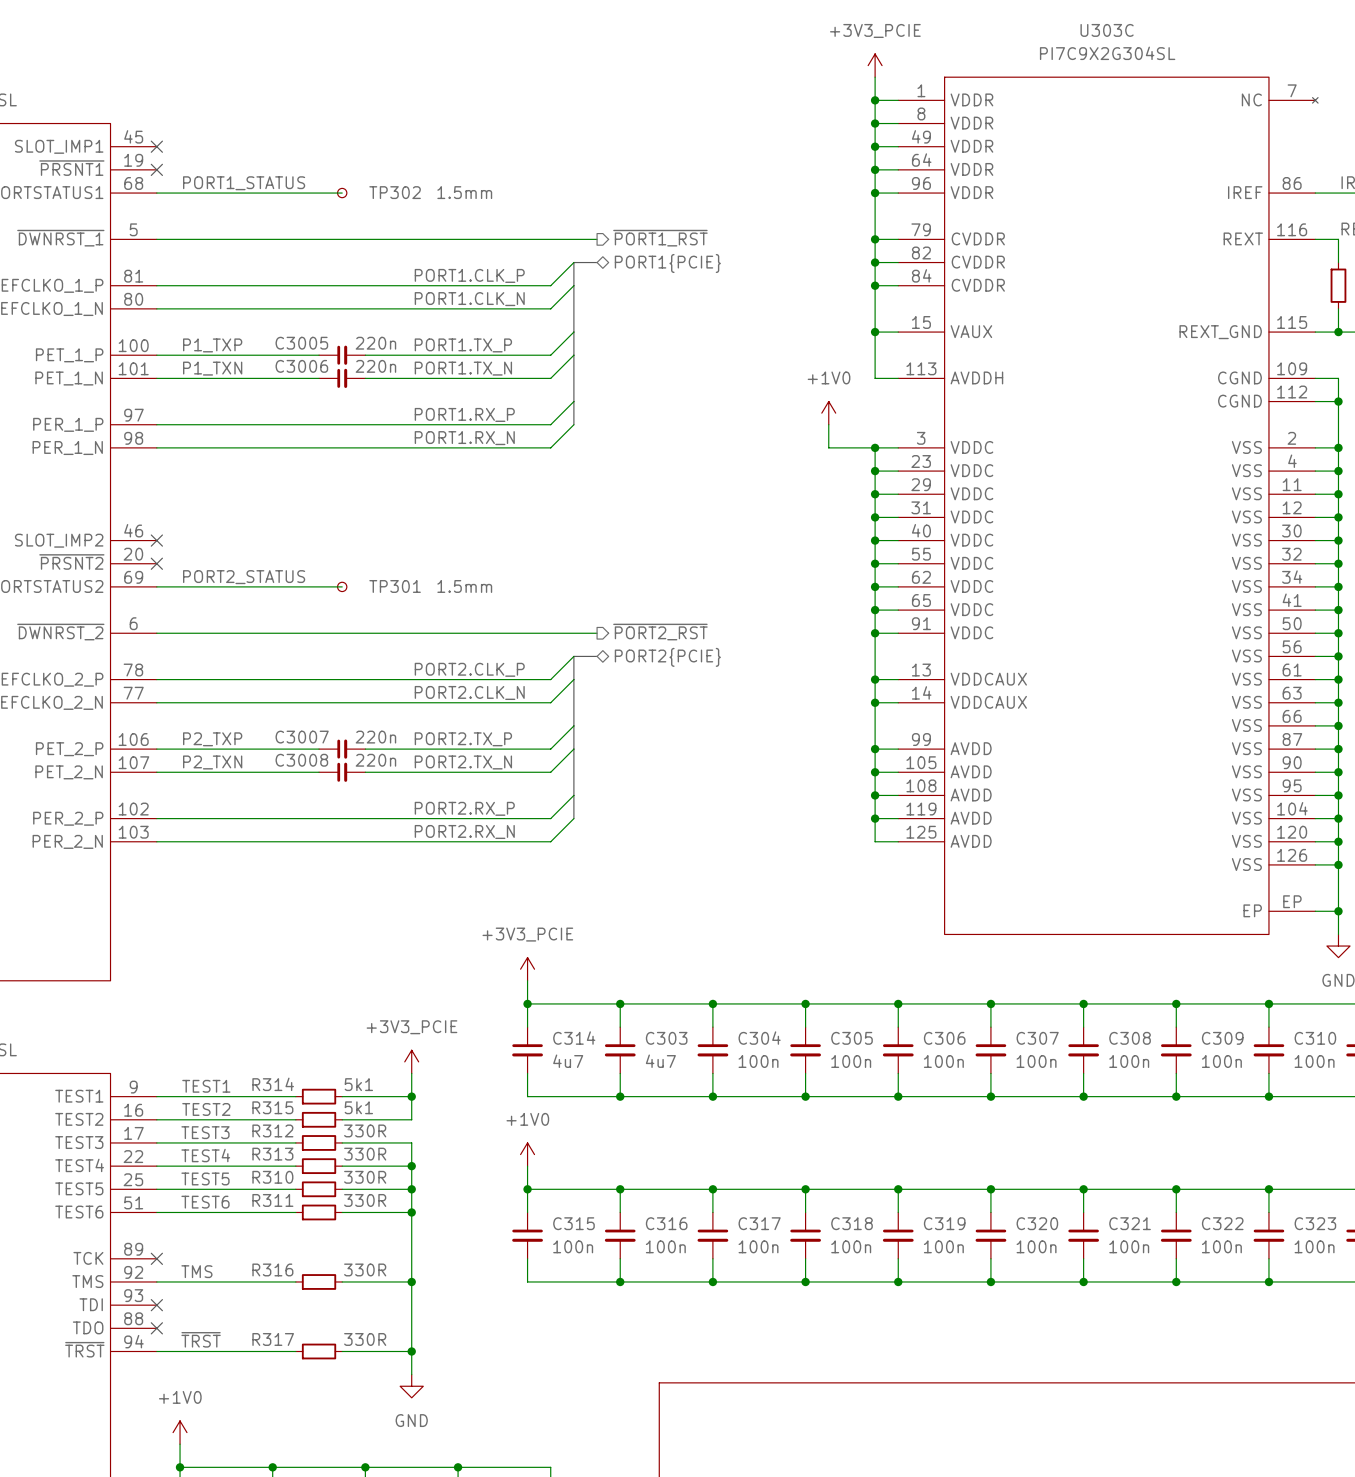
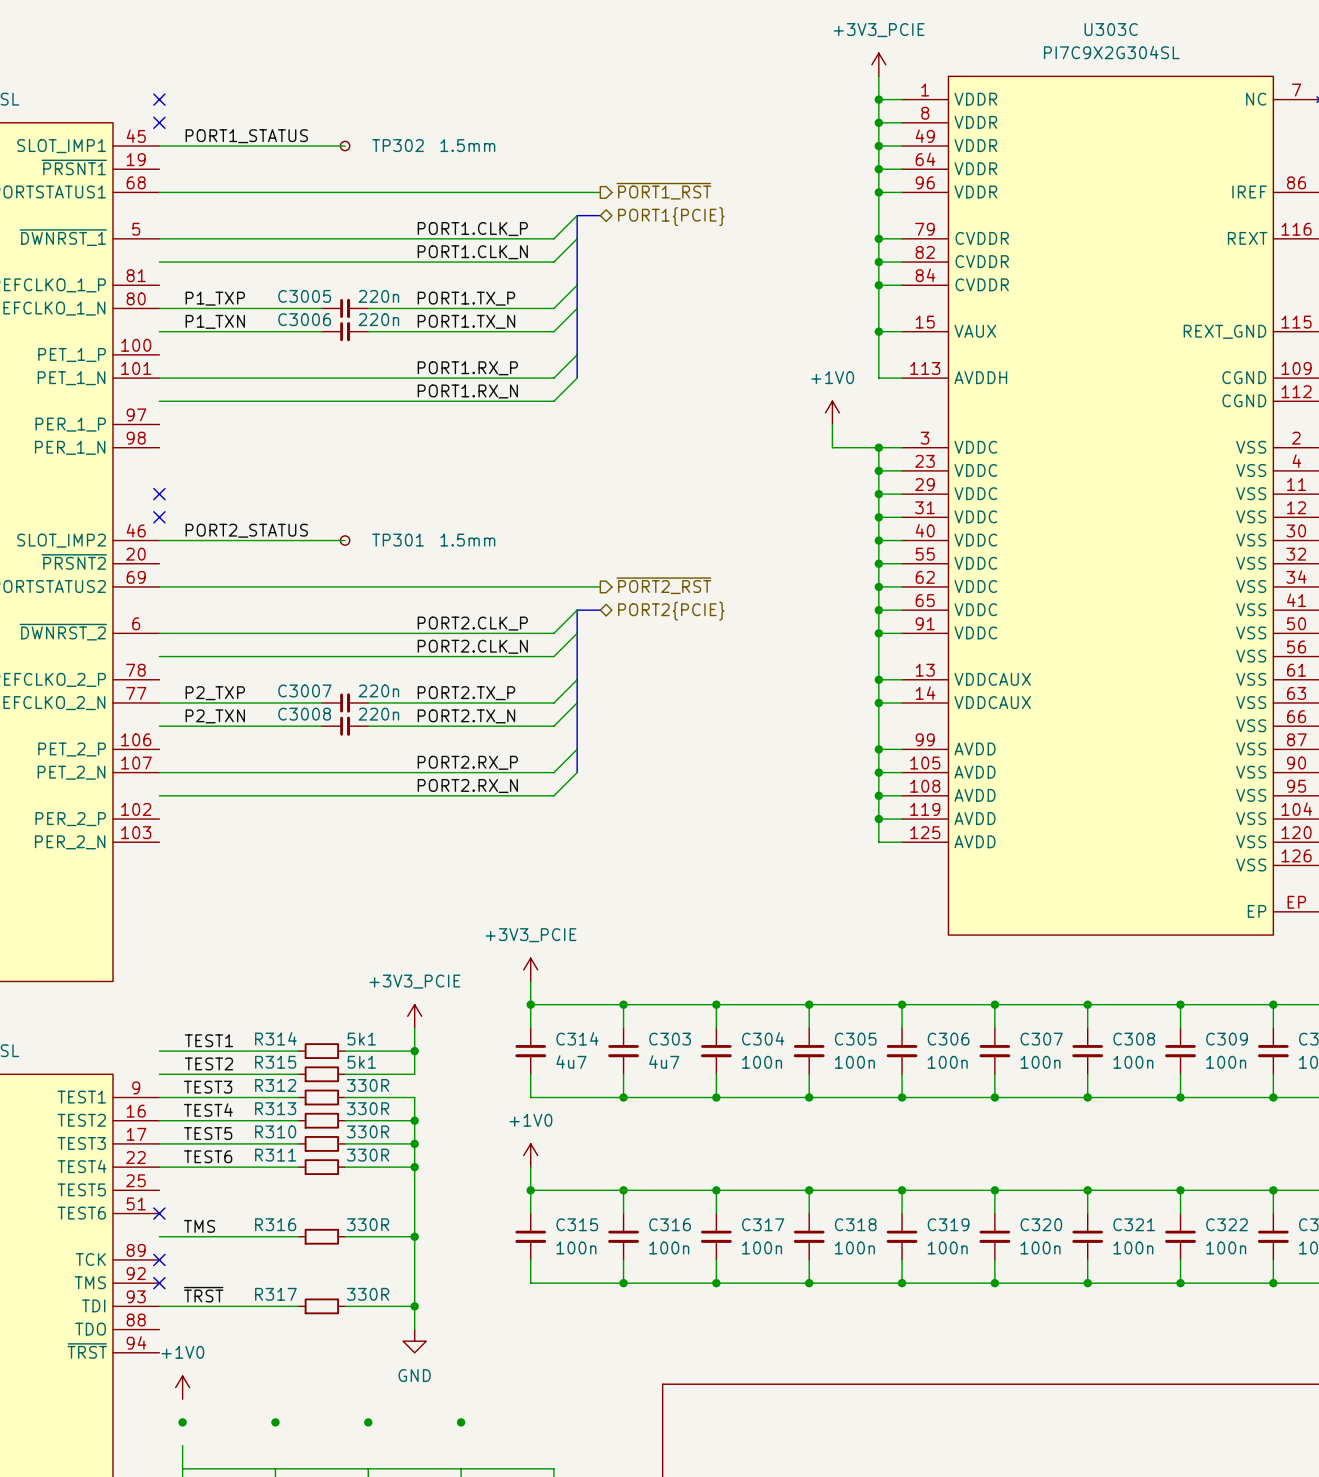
no-connect mark: none -> (159, 99)
no-connect mark: none -> (159, 122)
wire: none -> (159, 146) (345, 146)
no-connect mark: (156, 146) -> none
no-connect mark: (156, 169) -> none
label position: PORT1_STATUS (244, 183) -> PORT1_STATUS (246, 136)
wire: none -> (345, 192) (600, 192)
TP302 position: (342, 193) -> (345, 146)
hierarchical label position: ~{PORT1_RST} (660, 238) -> ~{PORT1_RST} (663, 191)
wire: (550, 239) (597, 239) -> (553, 238) (577, 215)
label: none -> PORT1.CLK_N (472, 252)
wire: (573, 262) (550, 285) (156, 285) -> (577, 238) (553, 262) (159, 262)
bus: (573, 262) (597, 262) -> (577, 262) (577, 215) (600, 215)
hierarchical label position: PORT1{PCIE} (667, 263) -> PORT1{PCIE} (671, 216)
label position: PORT1.CLK_P (469, 275) -> PORT1.CLK_P (472, 229)
label: PORT1.CLK_N (469, 299) -> PORT1.TX_P (466, 298)
wire: (573, 332) (550, 355) (365, 355) -> (577, 308) (553, 331) (368, 331)
label position: P1_TXP (212, 345) -> P1_TXP (215, 298)
label: PORT1.TX_P (463, 345) -> PORT1.TX_N (466, 321)
wire: (156, 355) (319, 355) -> (159, 331) (321, 331)
C3005 position: (342, 355) -> (345, 308)
label position: P1_TXN (212, 368) -> P1_TXN (215, 321)
label: PORT1.TX_N (463, 368) -> PORT1.RX_P (467, 368)
C3006 position: (342, 378) -> (345, 331)
bus: (573, 378) (573, 424) -> none
wire: (573, 401) (550, 424) (156, 424) -> none
label: PORT1.RX_P (464, 414) -> none
wire: (573, 424) (550, 447) (156, 447) -> (577, 378) (553, 401) (159, 401)
label position: PORT1.RX_N (464, 438) -> PORT1.RX_N (467, 391)
no-connect mark: none -> (159, 494)
no-connect mark: none -> (159, 517)
wire: none -> (159, 540) (345, 540)
no-connect mark: (156, 540) -> none
no-connect mark: (156, 563) -> none
label position: PORT2_STATUS (244, 577) -> PORT2_STATUS (246, 530)
wire: none -> (345, 586) (600, 586)
TP301 position: (342, 586) -> (345, 540)
hierarchical label position: ~{PORT2_RST} (660, 632) -> ~{PORT2_RST} (663, 585)
wire: (550, 633) (597, 633) -> (553, 633) (577, 610)
label: none -> PORT2.CLK_N (472, 646)
wire: (573, 656) (550, 679) (156, 679) -> (577, 633) (553, 656) (159, 656)
bus: (573, 656) (597, 656) -> (577, 656) (577, 610) (600, 610)
hierarchical label position: PORT2{PCIE} (667, 657) -> PORT2{PCIE} (671, 611)
label position: PORT2.CLK_P (469, 669) -> PORT2.CLK_P (472, 623)
label: PORT2.CLK_N (469, 692) -> PORT2.TX_P (466, 693)
wire: (573, 725) (550, 749) (365, 749) -> (577, 702) (553, 726) (368, 726)
label position: P2_TXP (212, 739) -> P2_TXP (215, 693)
label: PORT2.TX_P (463, 739) -> PORT2.TX_N (466, 716)
wire: (156, 749) (319, 749) -> (159, 726) (321, 726)
C3007 position: (342, 749) -> (345, 702)
label position: P2_TXN (212, 762) -> P2_TXN (215, 716)
label: PORT2.TX_N (463, 762) -> PORT2.RX_P (467, 762)
C3008 position: (342, 772) -> (345, 726)
bus: (573, 772) (573, 818) -> none
wire: (573, 795) (550, 818) (156, 818) -> none
label: PORT2.RX_P (464, 808) -> none
wire: (573, 818) (550, 841) (156, 841) -> (577, 772) (553, 795) (159, 795)
label position: PORT2.RX_N (464, 831) -> PORT2.RX_N (467, 786)
wire: none -> (414, 1027) (414, 1074) (345, 1074)
label: none -> TEST1 (208, 1040)
R314: none -> 5k1 (321, 1051)
junction: none -> (414, 1051)
power symbol position: +3V3_PCIE (411, 1061) -> +3V3_PCIE (414, 1016)
label: none -> TEST2 (208, 1063)
R315: none -> 5k1 (321, 1074)
wire: (411, 1073) (411, 1096) -> (414, 1120) (414, 1143)
R314 name: R314 (273, 1084) -> R312 (275, 1085)
R314 value: 5k1 (358, 1084) -> 330R (368, 1085)
label: TEST1 (206, 1086) -> TEST3 (208, 1087)
junction: (411, 1096) -> none
R315 name: R315 (272, 1107) -> R313 (275, 1108)
R315 value: 5k1 (358, 1107) -> 330R (368, 1108)
label: TEST2 (206, 1109) -> TEST4 (208, 1110)
junction: none -> (414, 1120)
R312 name: R312 (272, 1130) -> R310 (275, 1131)
label: TEST3 (205, 1132) -> TEST5 (208, 1133)
junction: none -> (414, 1143)
R313 name: R313 (272, 1154) -> R311 (275, 1155)
label: TEST4 (205, 1155) -> TEST6 (208, 1156)
label: TEST5 (205, 1178) -> none
wire: (156, 1189) (295, 1189) -> (159, 1074) (298, 1074)
R310: 330R (319, 1189) -> none
wire: (342, 1189) (411, 1189) -> none
junction: (411, 1189) -> none
label: TEST6 (205, 1202) -> none
wire: (156, 1212) (295, 1212) -> (159, 1051) (298, 1051)
no-connect mark: none -> (159, 1213)
R311: 330R (319, 1212) -> none
wire: (342, 1212) (411, 1212) -> (345, 1051) (414, 1051)
junction: (411, 1212) -> none
junction: none -> (414, 1236)
label position: TMS (196, 1271) -> TMS (199, 1226)
wire: (156, 1281) (295, 1281) -> (159, 1236) (298, 1236)
no-connect mark: none -> (159, 1283)
R316 position: (319, 1281) -> (321, 1236)
wire: (342, 1281) (411, 1281) -> (345, 1236) (414, 1236)
junction: (411, 1281) -> none
no-connect mark: (156, 1305) -> none
junction: none -> (414, 1306)
no-connect mark: (156, 1328) -> none
wire: (411, 1328) (411, 1374) -> none
label position: ~{TRST} (201, 1339) -> ~{TRST} (203, 1294)
wire: (156, 1351) (295, 1351) -> (159, 1306) (298, 1306)
R317 position: (319, 1351) -> (321, 1306)
wire: (342, 1351) (411, 1351) -> (345, 1306) (414, 1306)
junction: (411, 1351) -> none
power symbol position: GND (411, 1386) -> GND (414, 1341)
junction: none -> (275, 1422)
junction: none -> (368, 1422)
junction: none -> (461, 1422)
power symbol position: +1V0 (180, 1432) -> +1V0 (182, 1387)
junction position: (180, 1467) -> (182, 1422)
junction: (272, 1467) -> none
junction: (365, 1467) -> none
junction: (458, 1467) -> none

